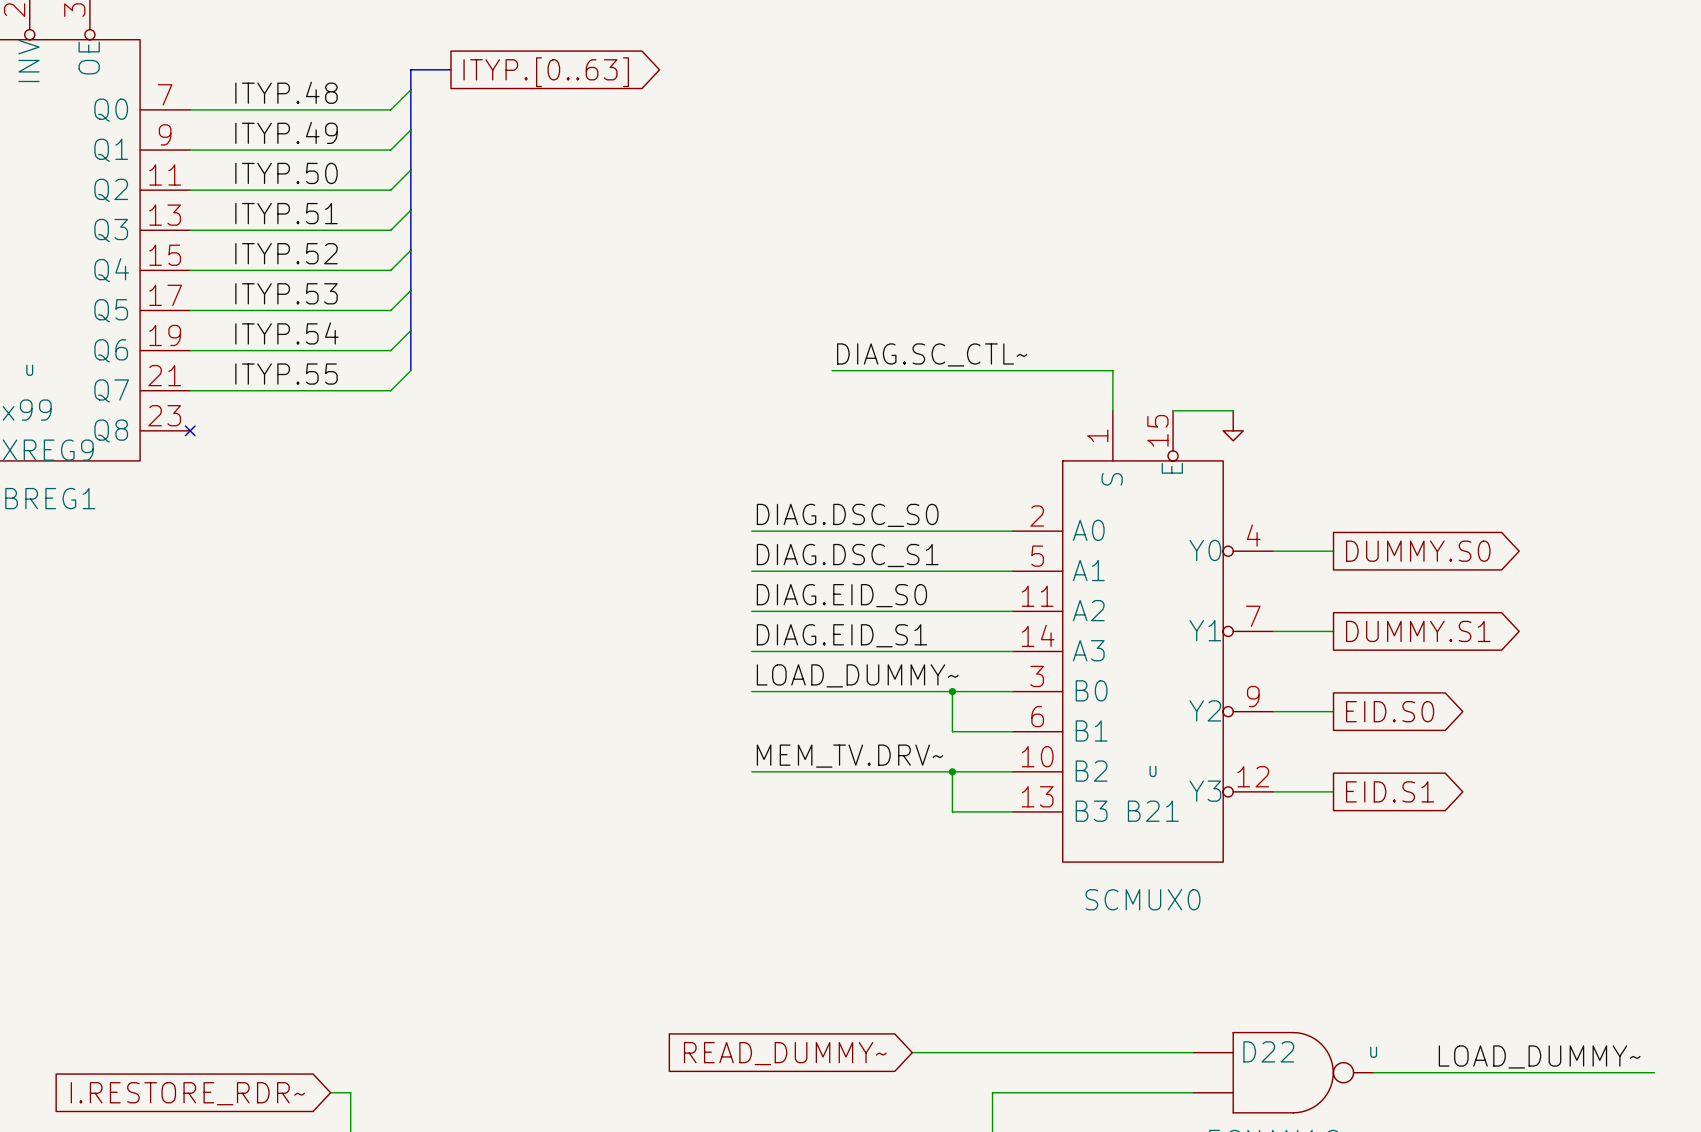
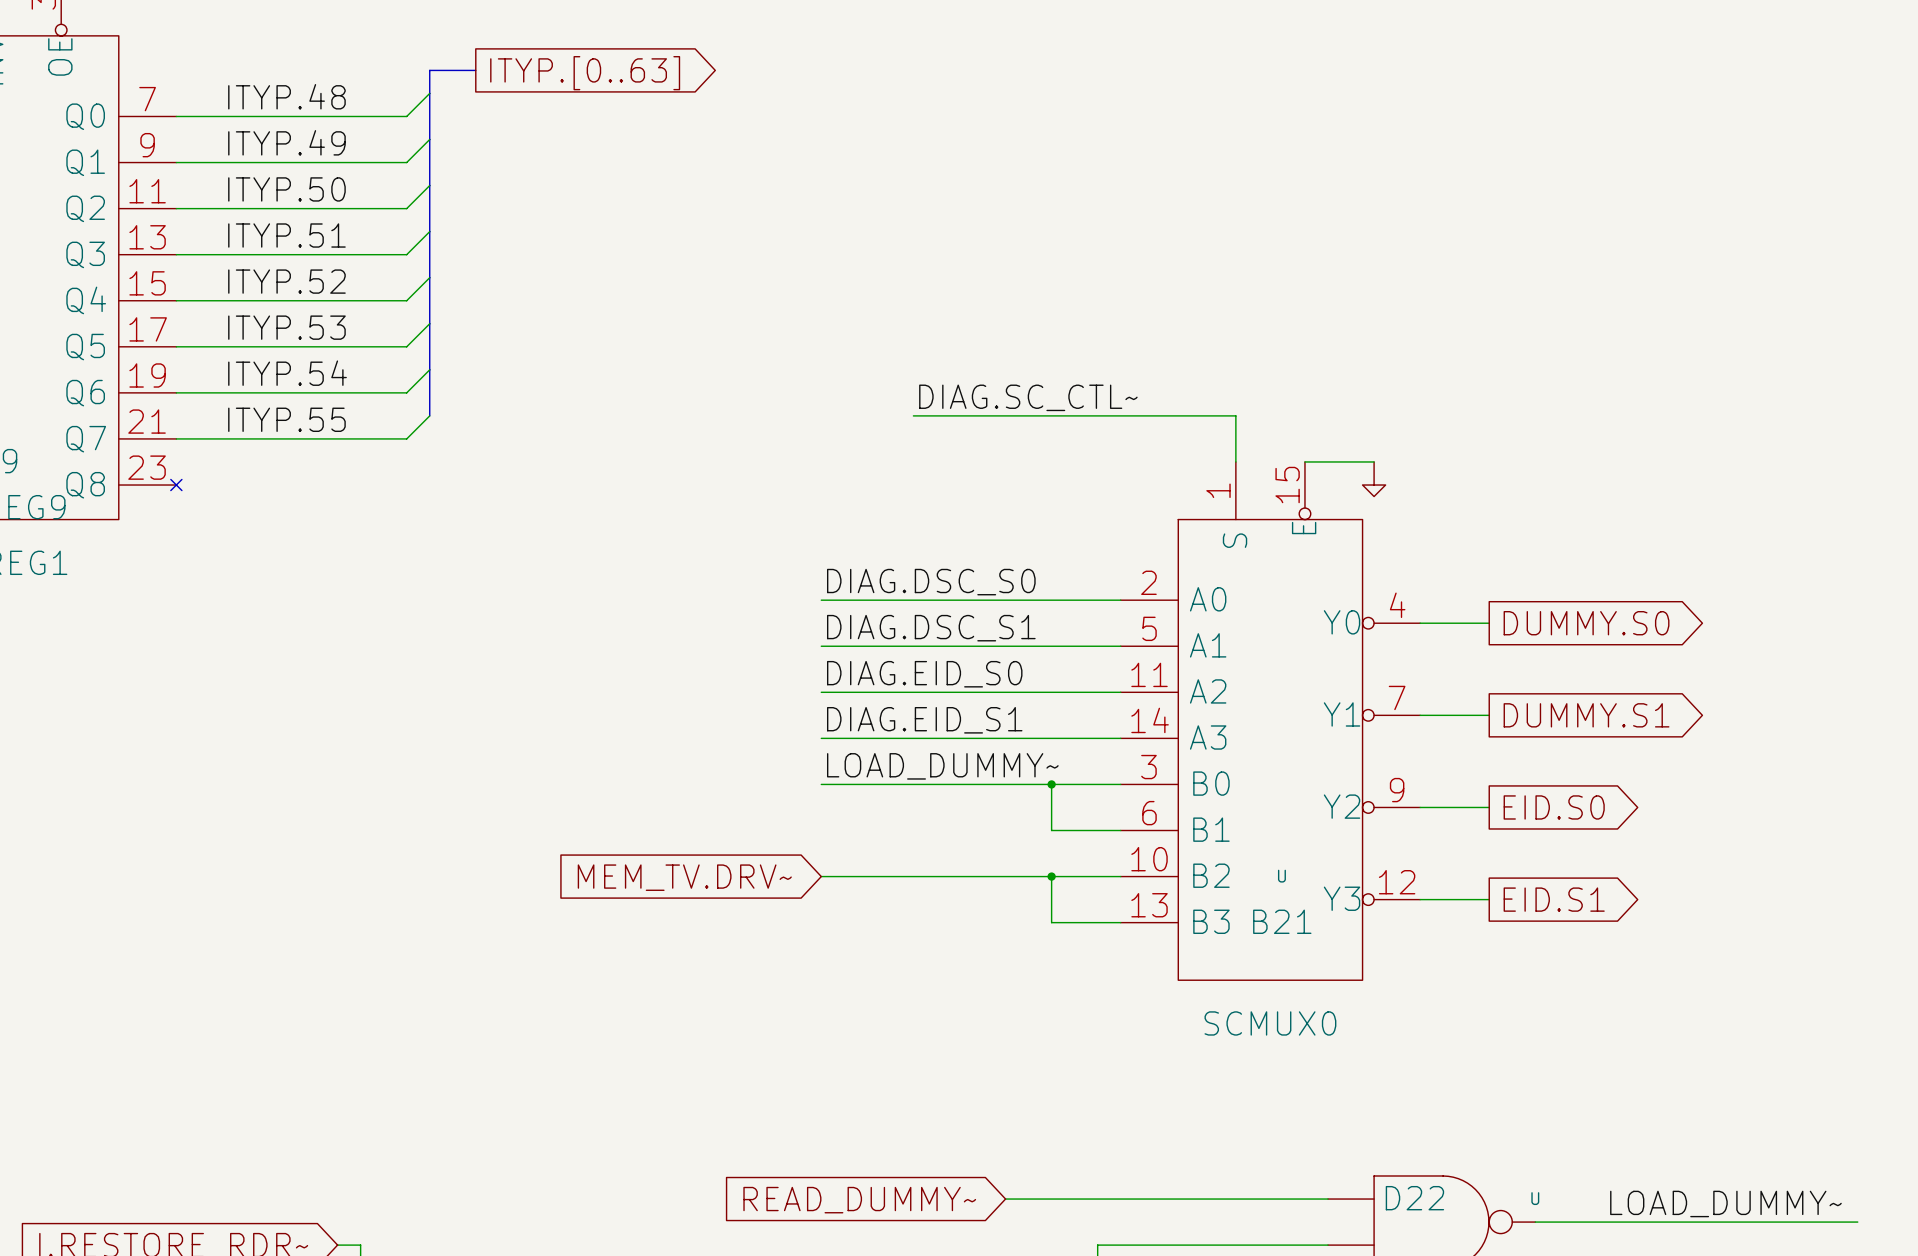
label: MEM_TV.DRV~ (850, 756) -> none
global label: none -> MEM_TV.DRV~ (684, 877)

